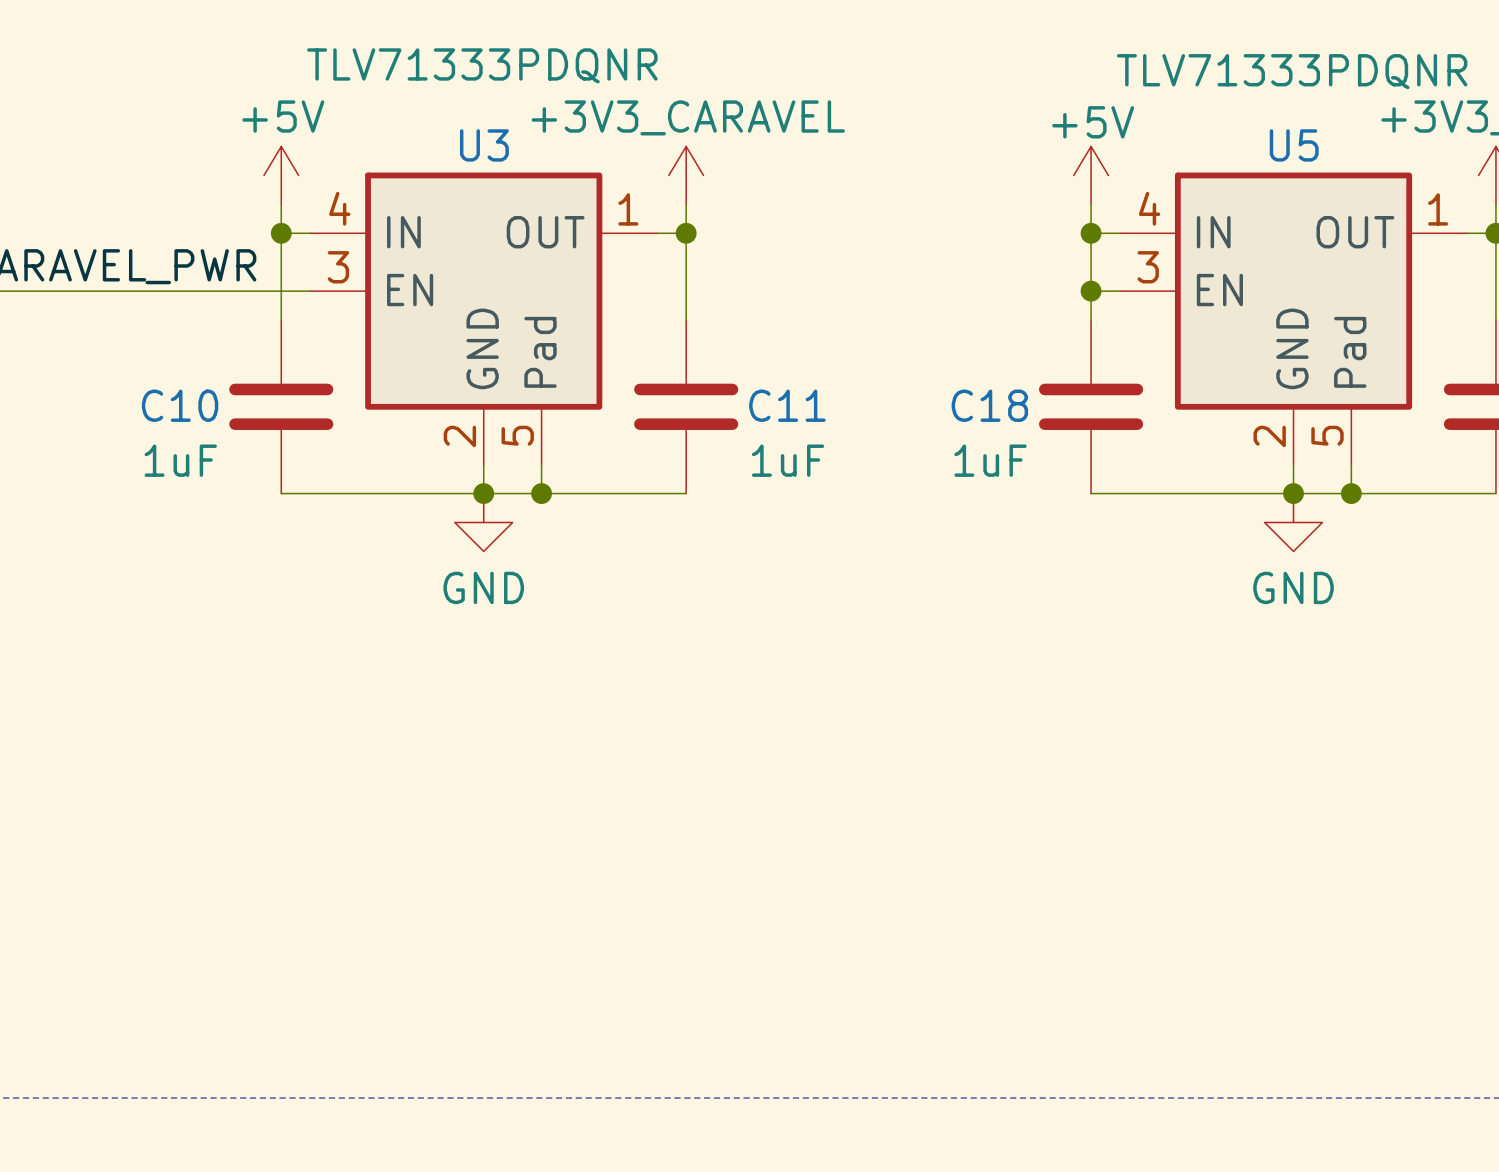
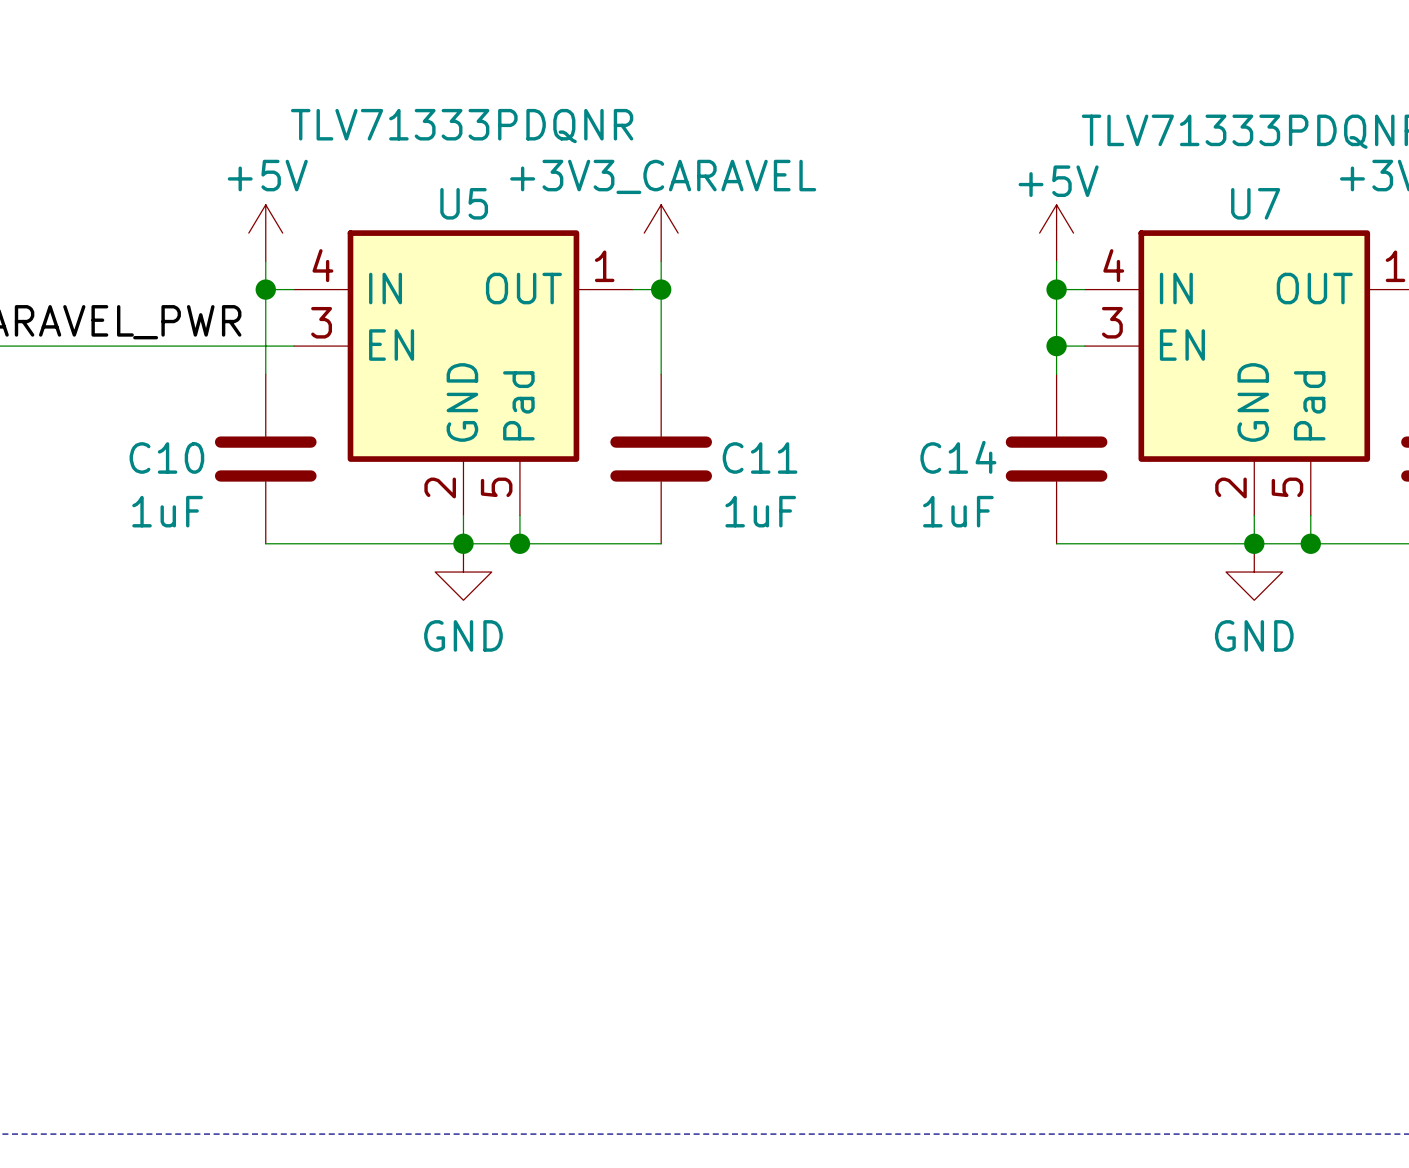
U3 name: U3 (484, 145) -> U5 (464, 203)
U5 name: U5 (1294, 145) -> U7 (1255, 203)
C18 name: C18 (989, 405) -> C14 (958, 457)

